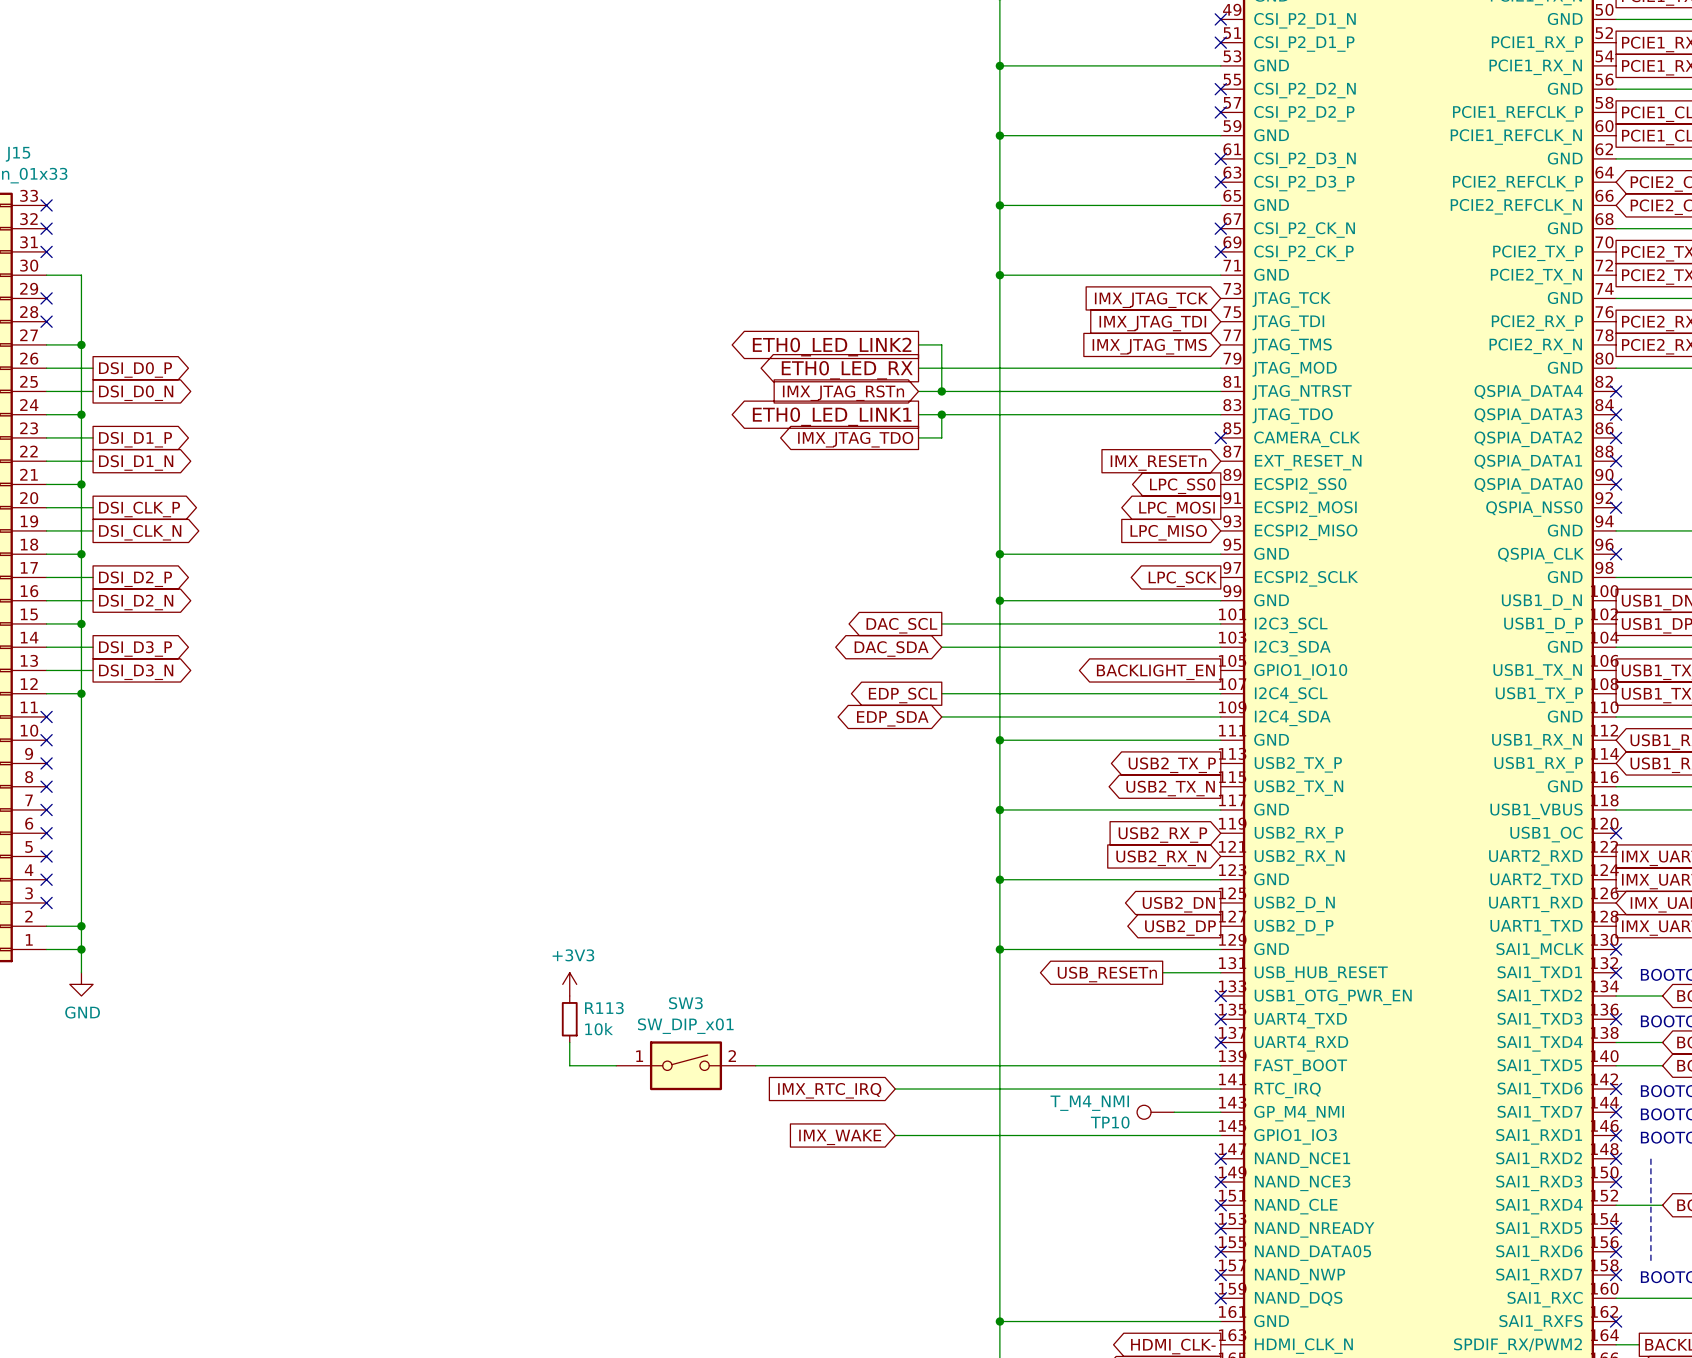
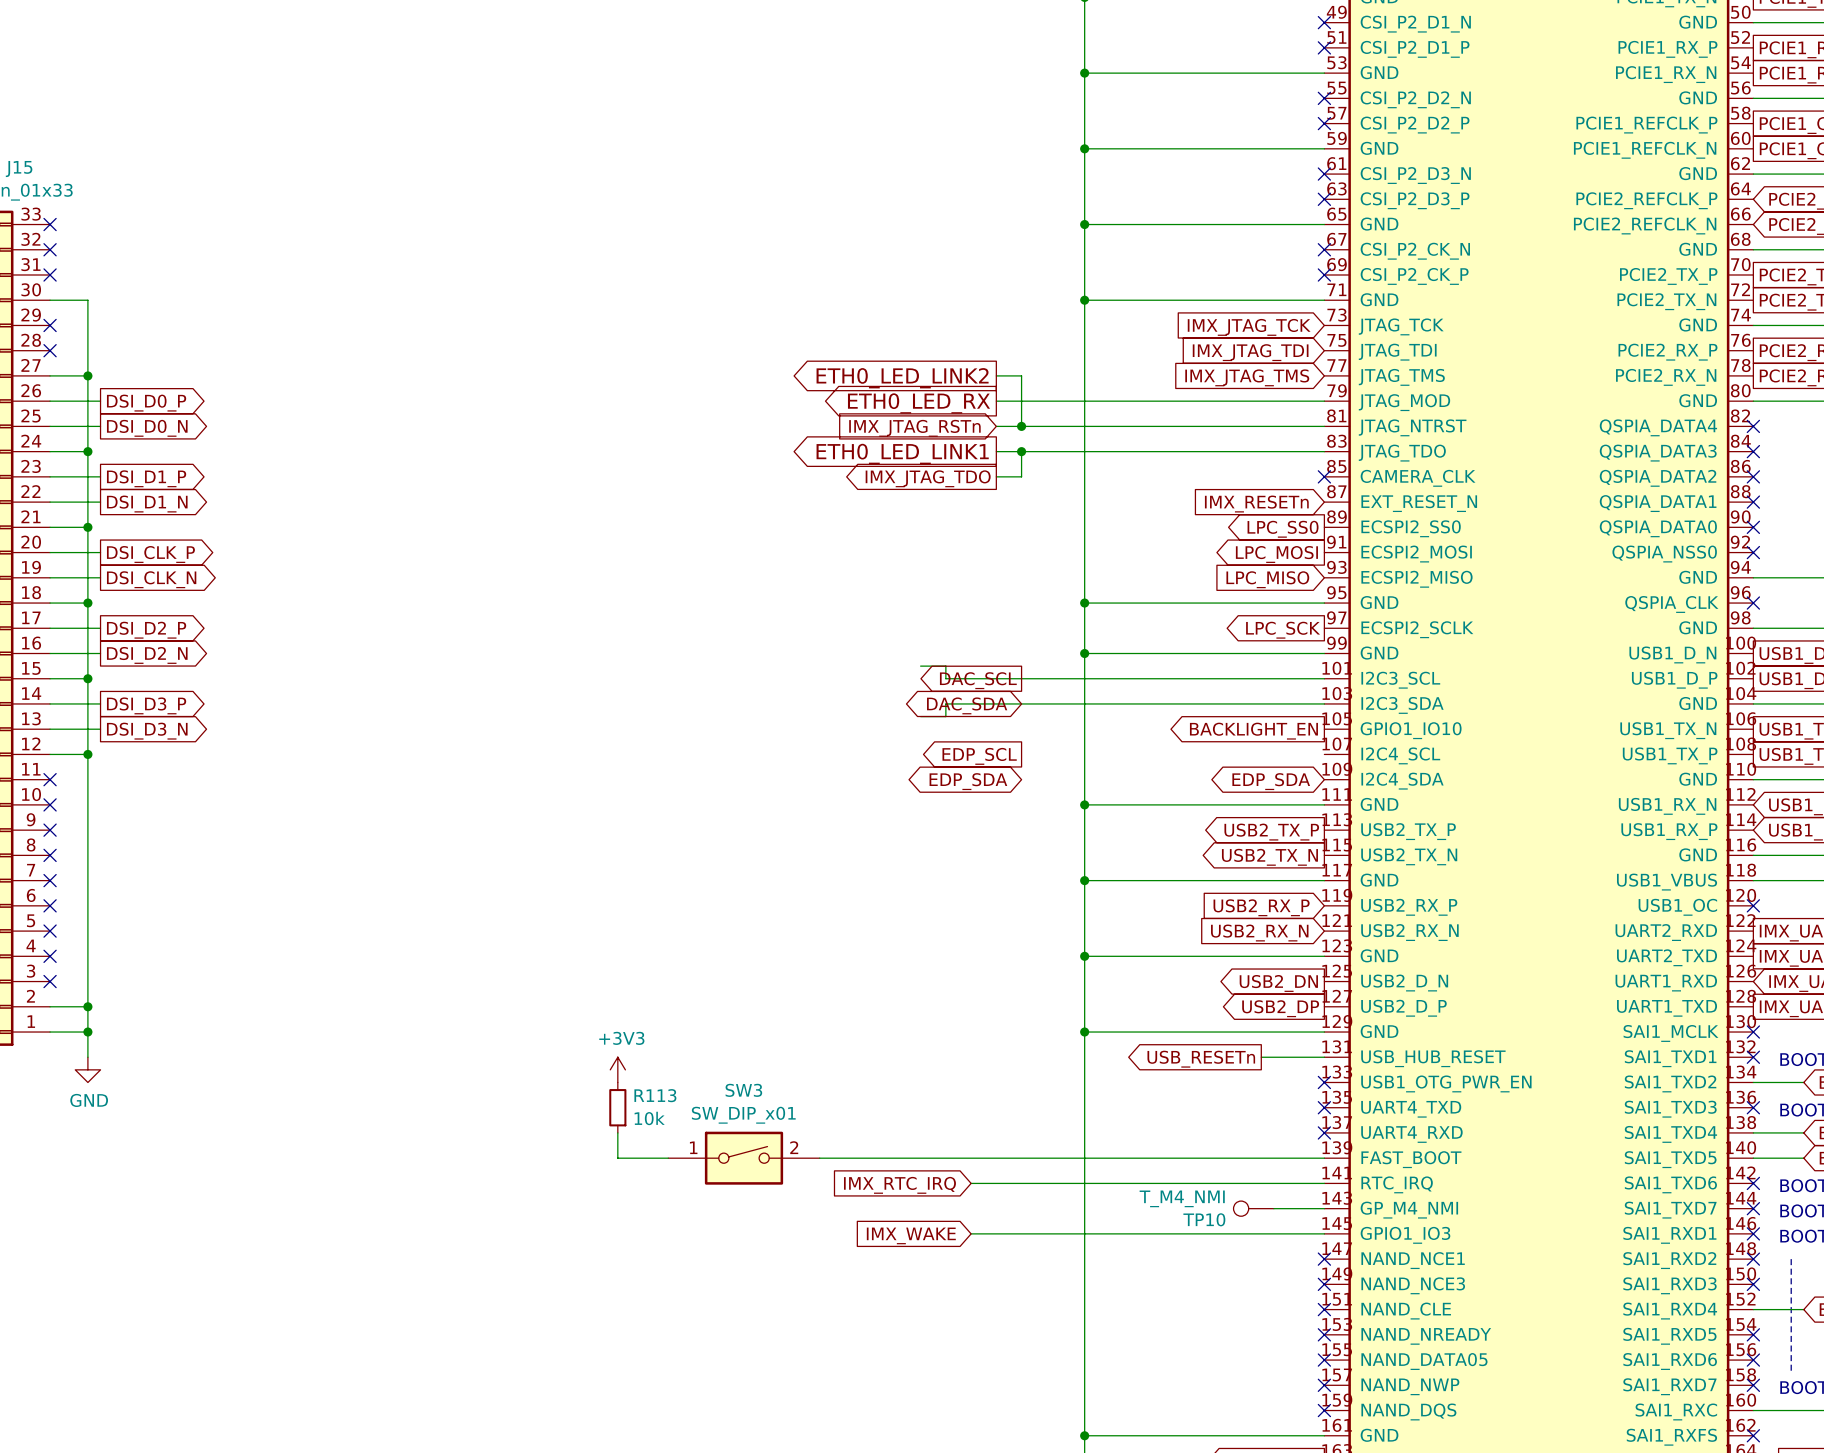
wire: none -> (920, 666) (945, 666) (945, 678) (1021, 678)
wire: none -> (1021, 703) (945, 703) (945, 716) (920, 716)
wire: (941, 693) (1220, 693) -> none
wire: (941, 716) (1220, 716) -> none
global label: none -> EDP_SDA (1271, 781)

